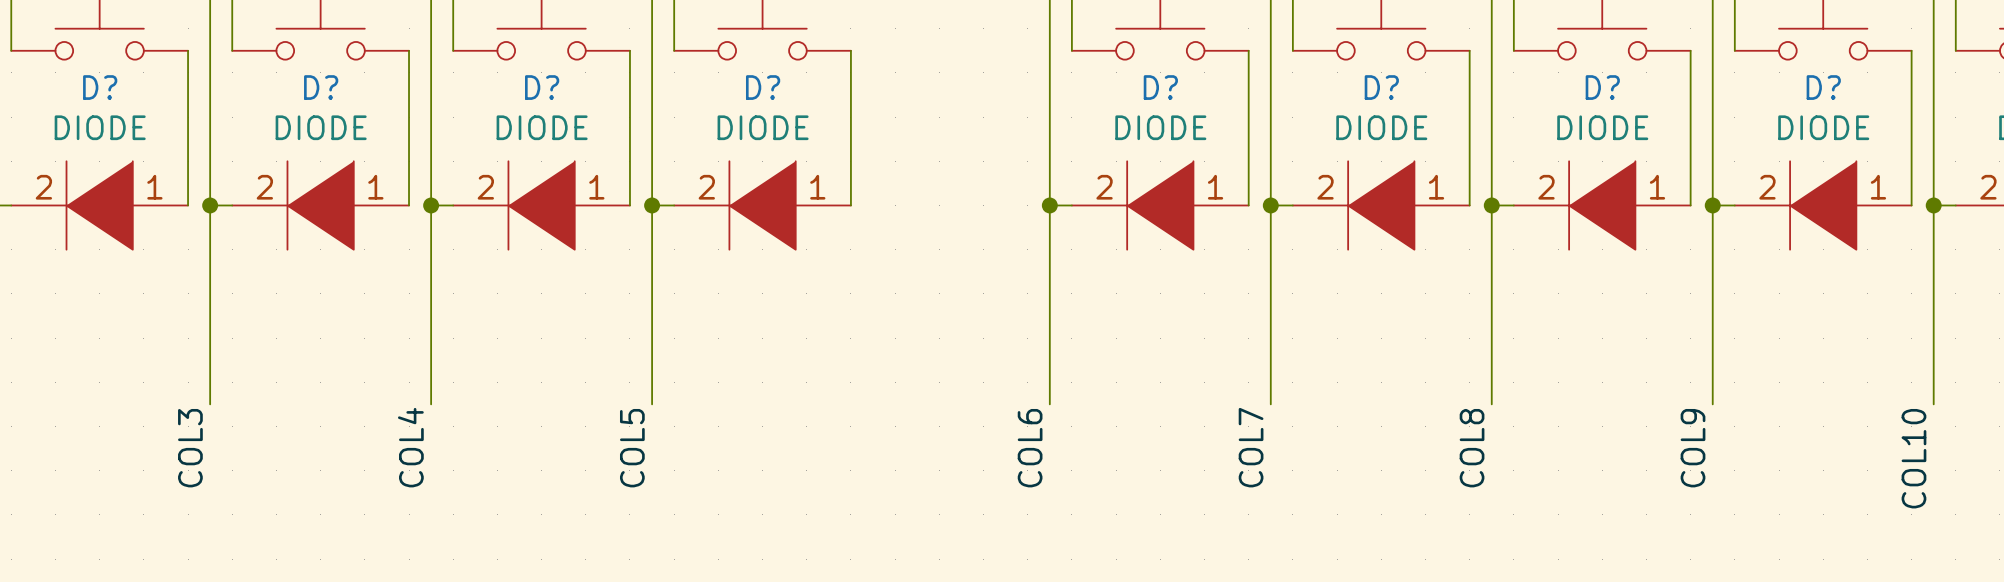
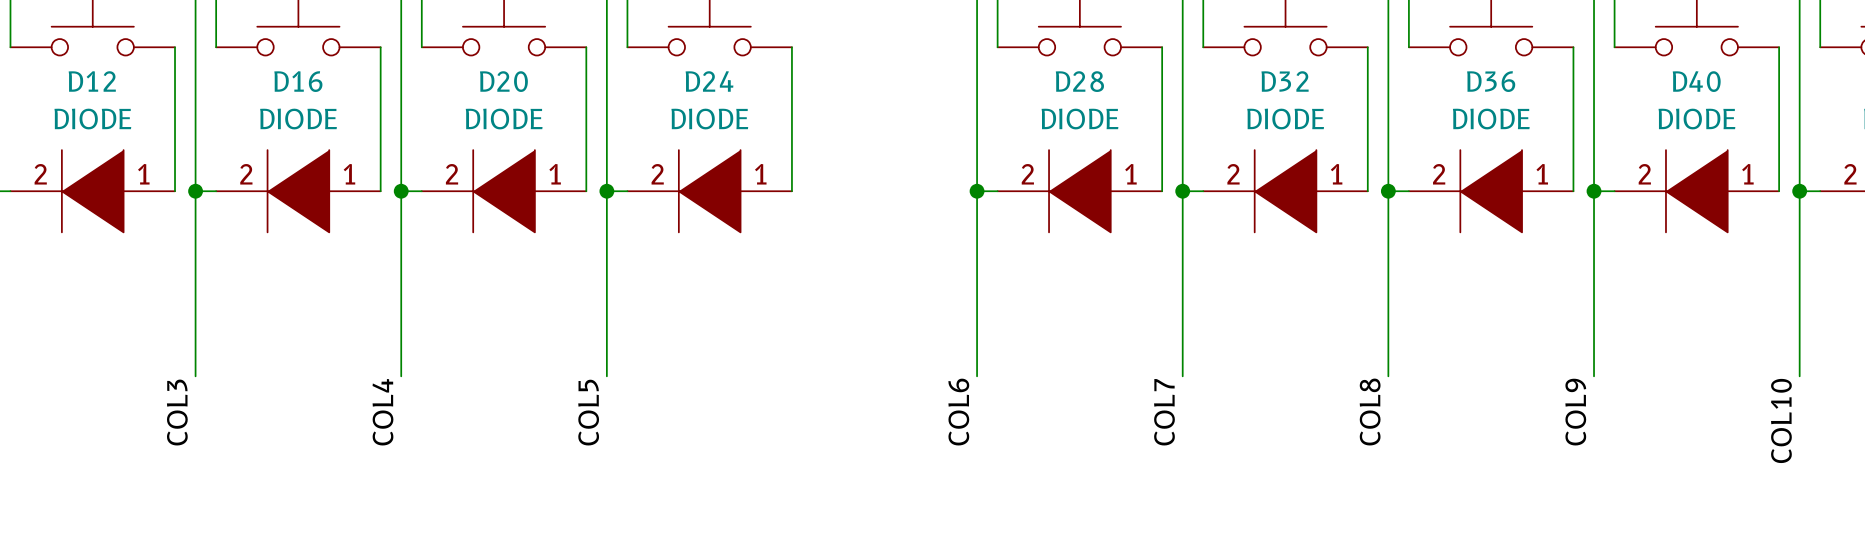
D? name: D? (100, 87) -> D12 (92, 81)
D? name: D? (321, 87) -> D16 (298, 81)
D? name: D? (542, 87) -> D20 (503, 81)
D? name: D? (763, 87) -> D24 (709, 81)
D? name: D? (1160, 87) -> D28 (1079, 81)
D? name: D? (1381, 87) -> D32 (1285, 81)
D? name: D? (1602, 87) -> D36 (1491, 81)
D? name: D? (1823, 87) -> D40 (1696, 81)

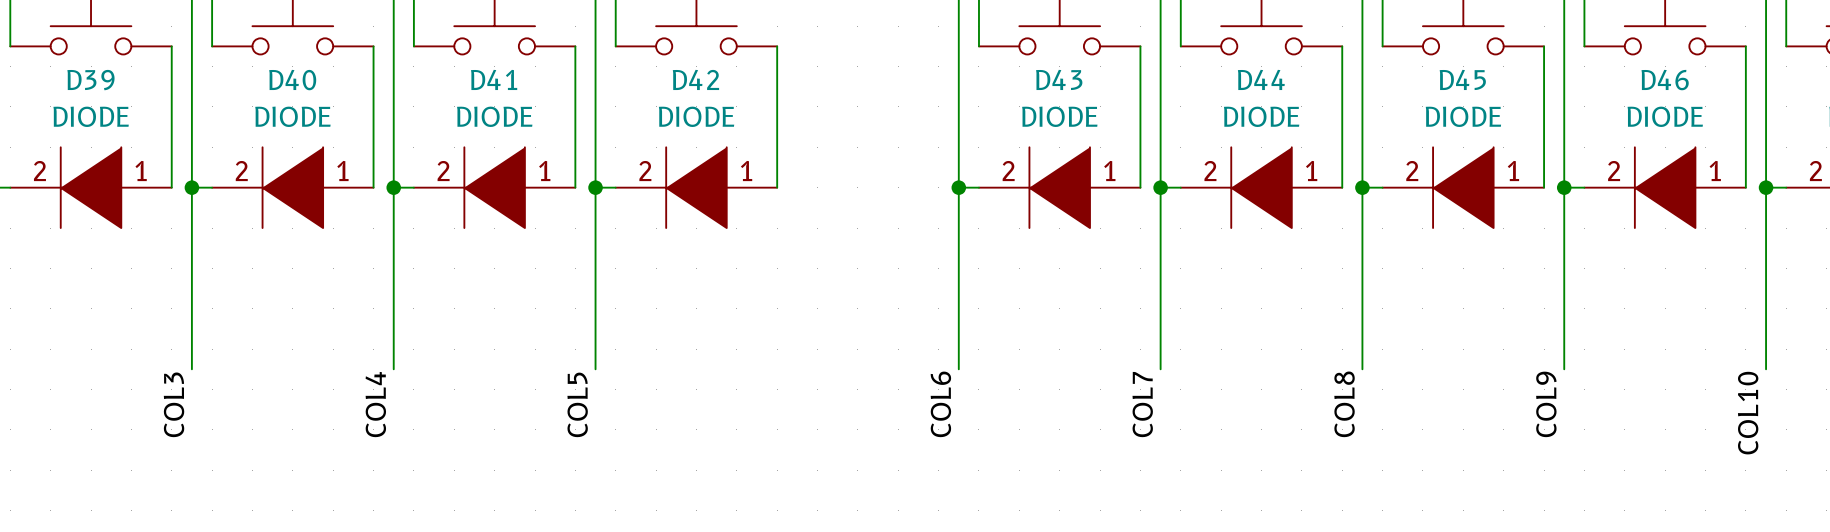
D12 name: D12 (92, 81) -> D39 (90, 80)
D16 name: D16 (298, 81) -> D40 (292, 80)
D20 name: D20 (503, 81) -> D41 (494, 79)
D24 name: D24 (709, 81) -> D42 (695, 79)
D28 name: D28 (1079, 81) -> D43 (1059, 79)
D32 name: D32 (1285, 81) -> D44 (1261, 79)
D36 name: D36 (1491, 81) -> D45 (1462, 79)
D40 name: D40 (1696, 81) -> D46 (1665, 80)

